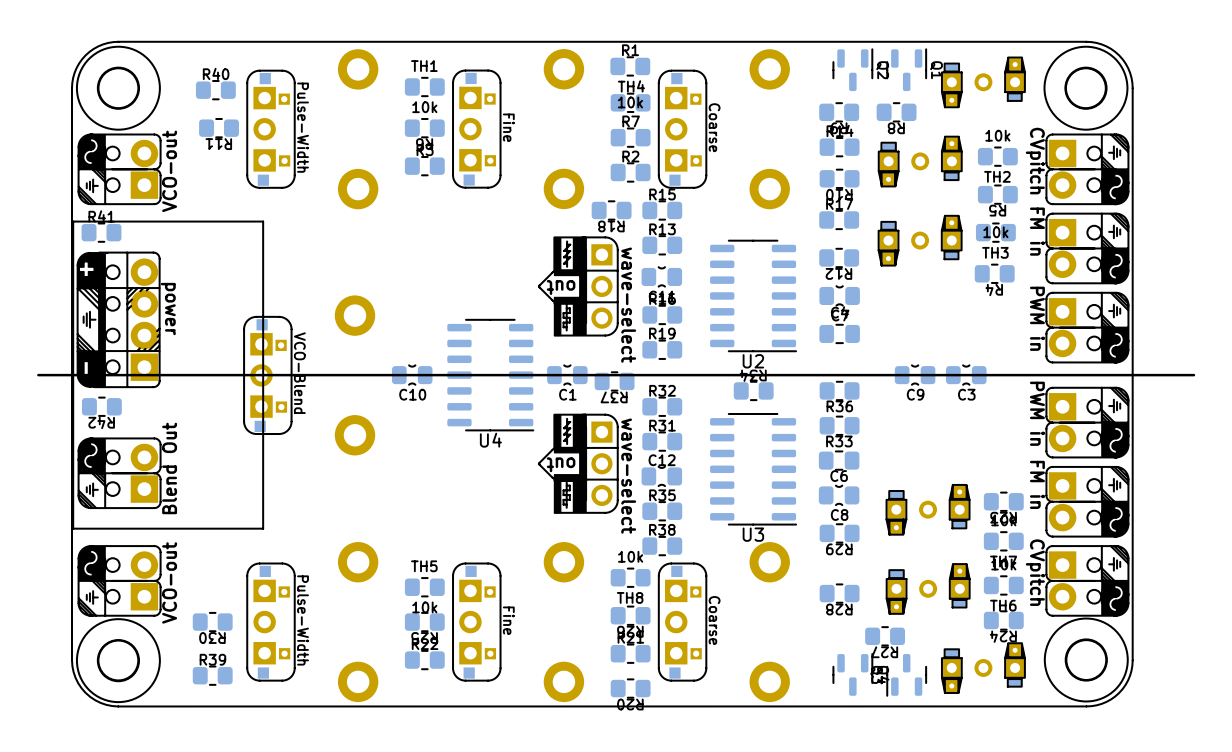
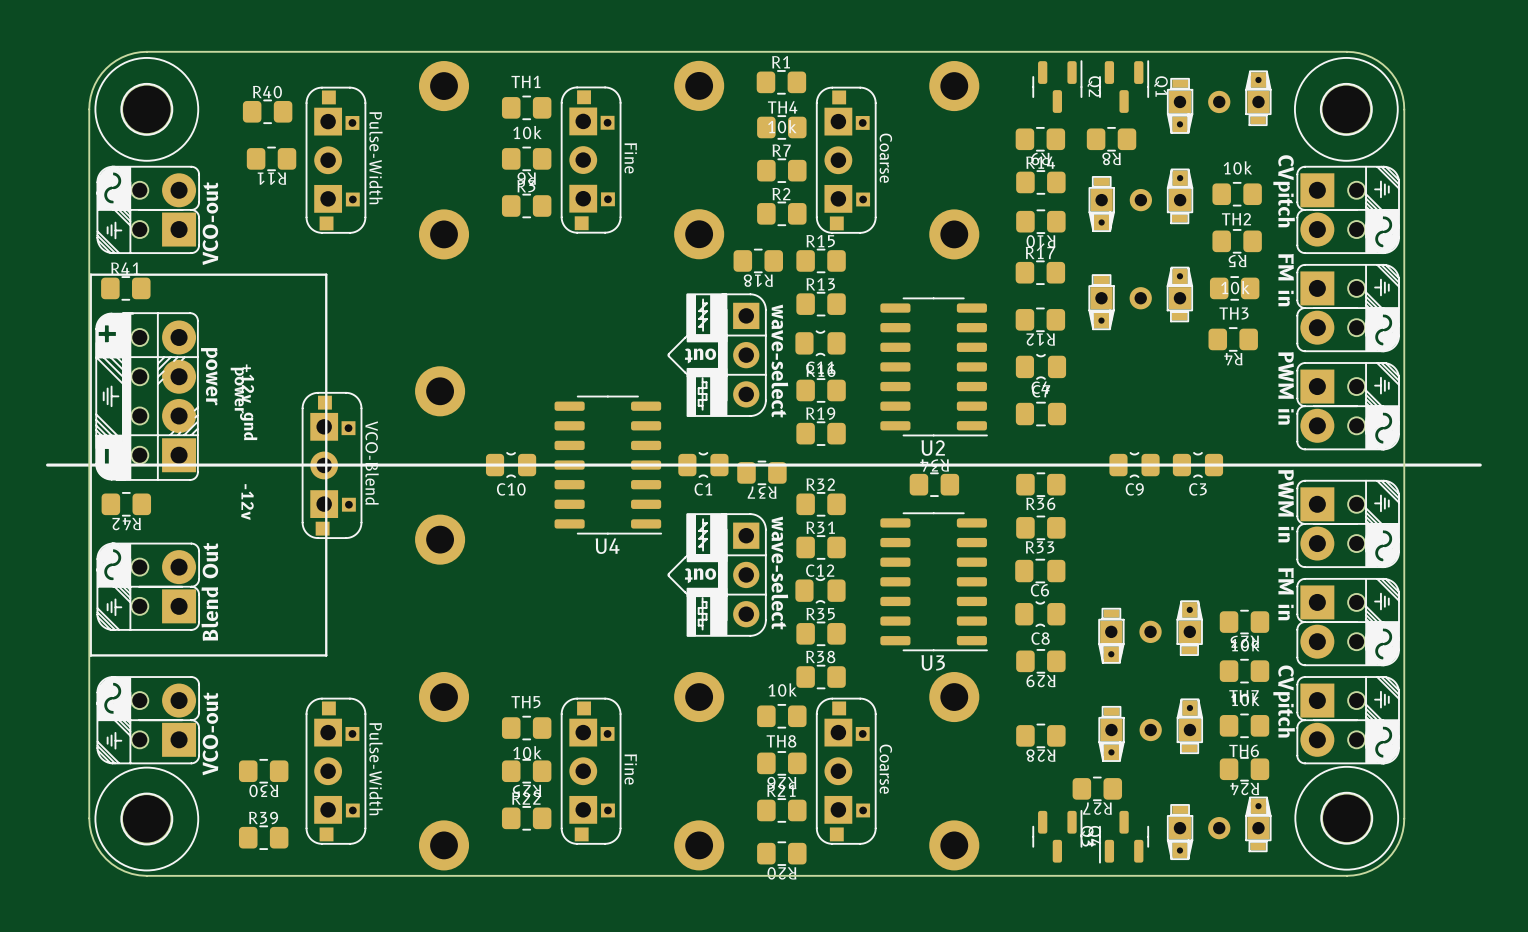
part text: none -> +12v (247, 383)
part text: none -> power (237, 390)
part text: none -> gnd (248, 426)
part text: none -> -12v (247, 502)

